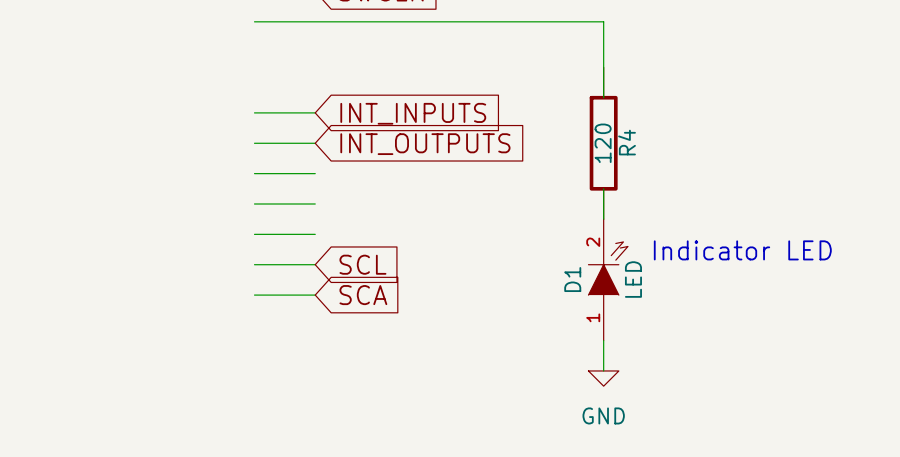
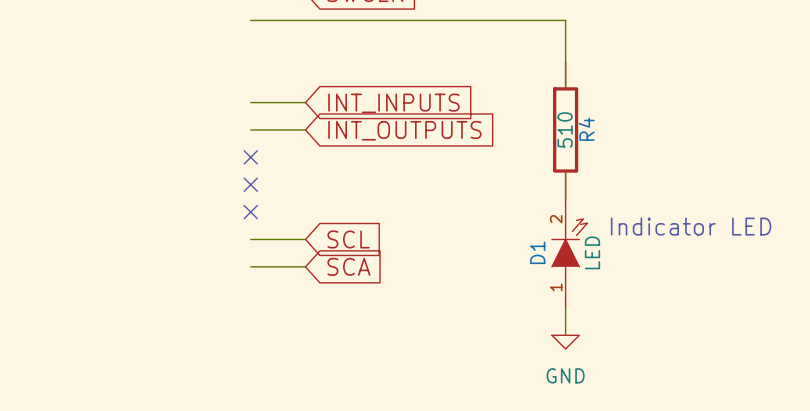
R4 value: 120 (603, 143) -> 510 (565, 129)
wire: (254, 173) (315, 173) -> none
no-connect mark: none -> (250, 157)
wire: (254, 203) (315, 203) -> none
no-connect mark: none -> (250, 184)
wire: (254, 234) (315, 234) -> none
no-connect mark: none -> (250, 212)

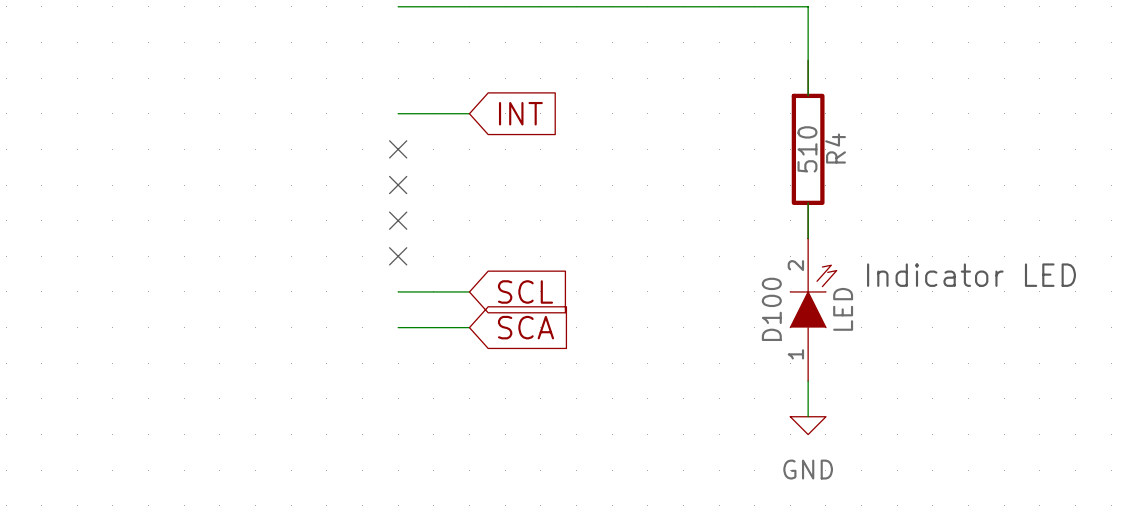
global label: INT_INPUTS (393, 103) -> INT (520, 113)
wire: (250, 129) (305, 129) -> none
no-connect mark: none -> (398, 149)
global label: INT_OUTPUTS (404, 130) -> none
D1 name: D1 (537, 252) -> D100 (771, 309)

